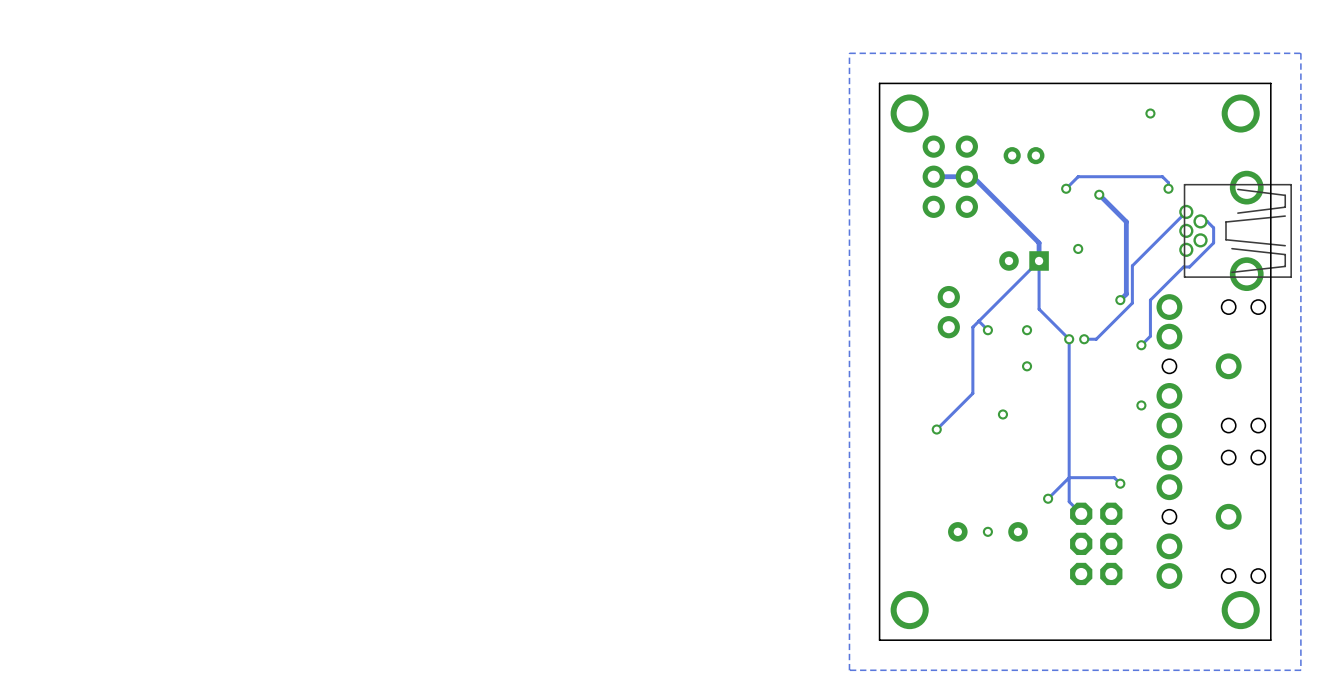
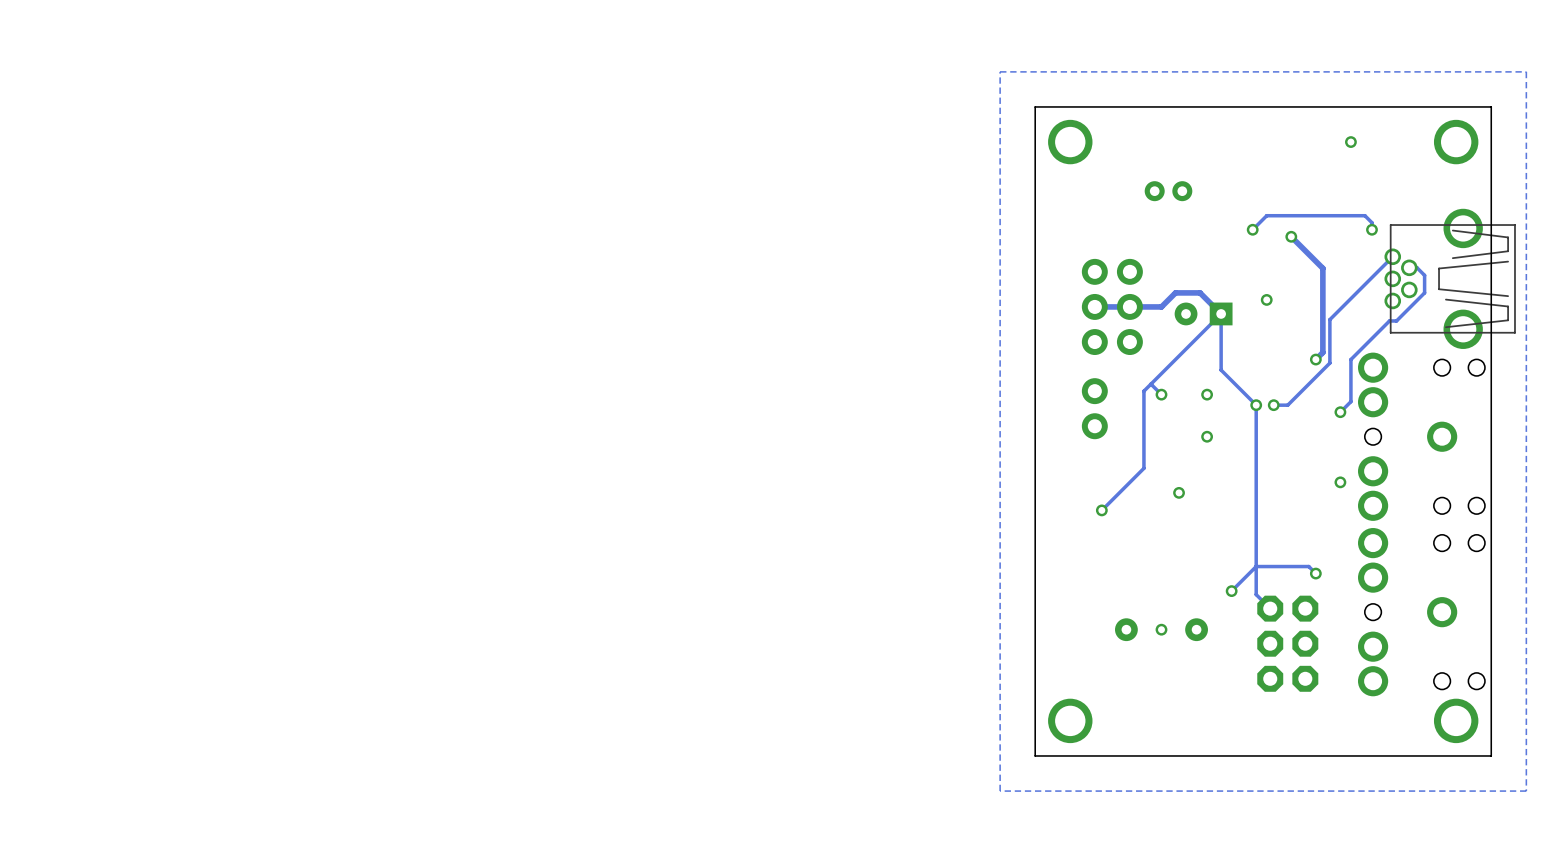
part position: (1024, 155) -> (1168, 191)
track: (933, 176) (972, 176) (1039, 242) (1039, 260) -> (1094, 306) (1161, 306) (1175, 292) (1200, 292) (1221, 313)
part: (933, 176) -> none
part: (966, 176) -> none
part: none -> (1094, 306)
part: none -> (1129, 306)
part position: (948, 312) -> (1094, 408)

